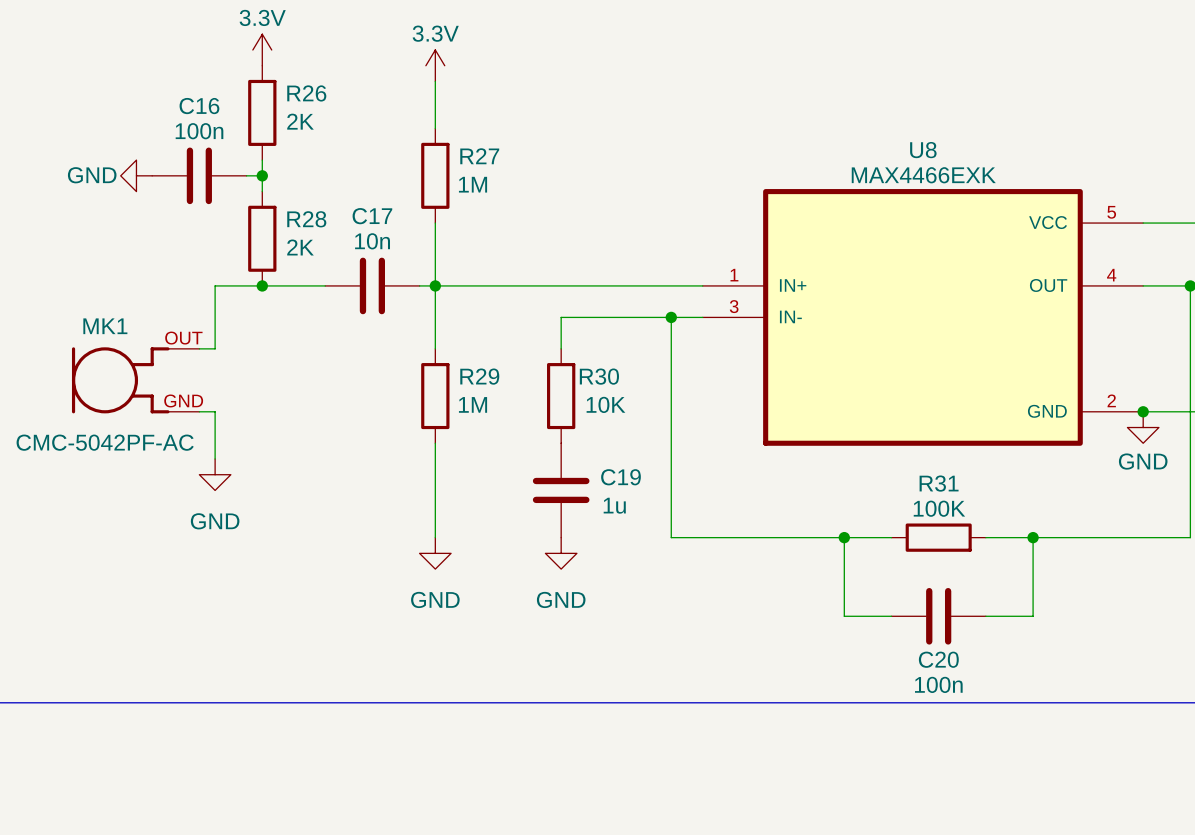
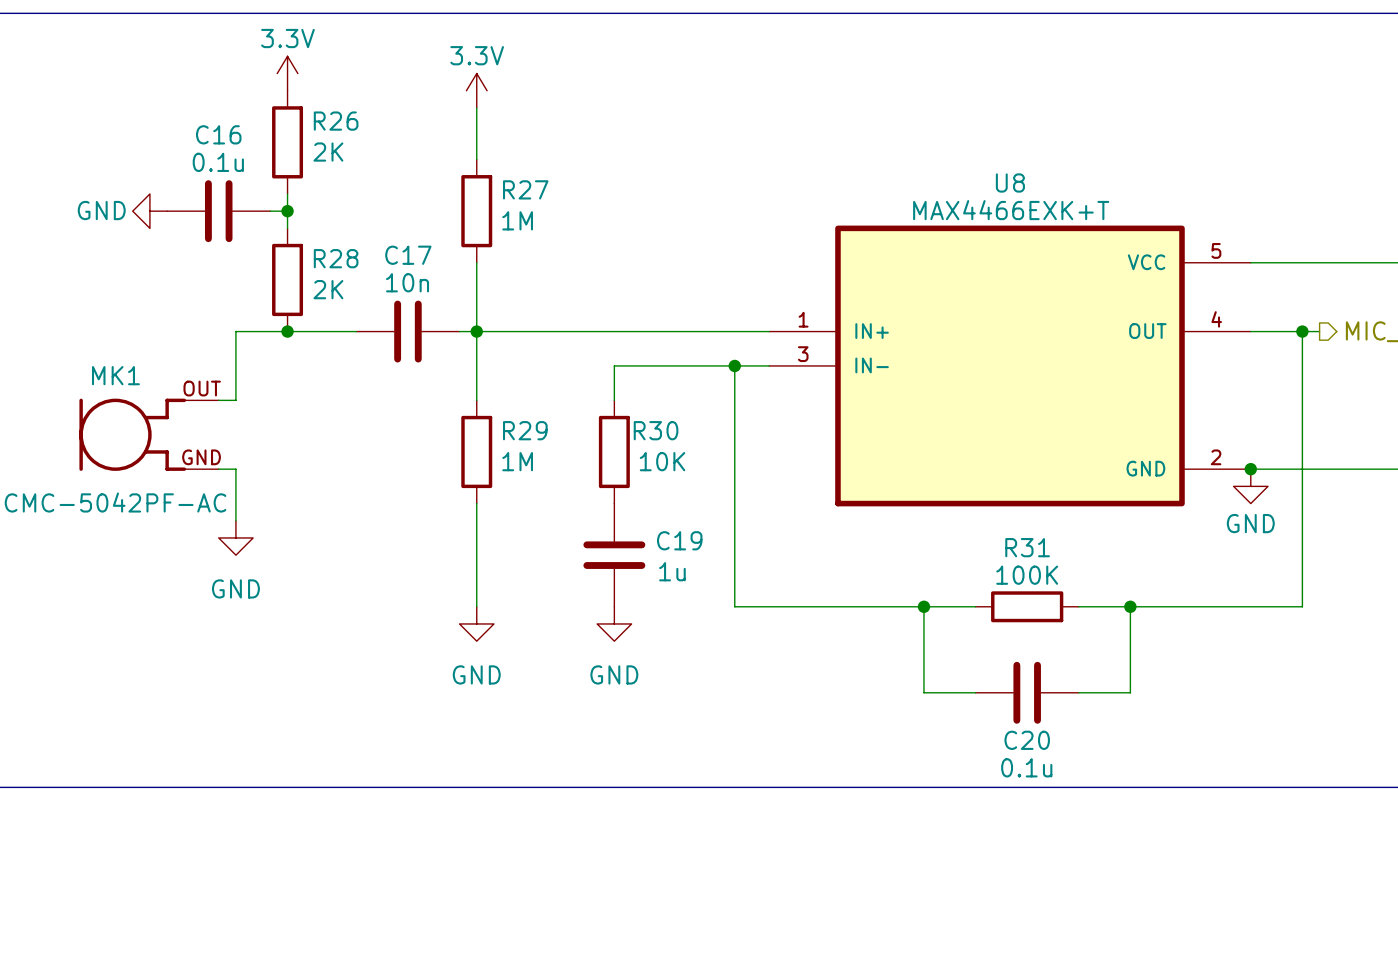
C16 value: 100n (199, 131) -> 0.1u (218, 162)
U8 value: MAX4466EXK (923, 175) -> MAX4466EXK+T (1011, 210)
C20 value: 100n (938, 684) -> 0.1u (1026, 767)

